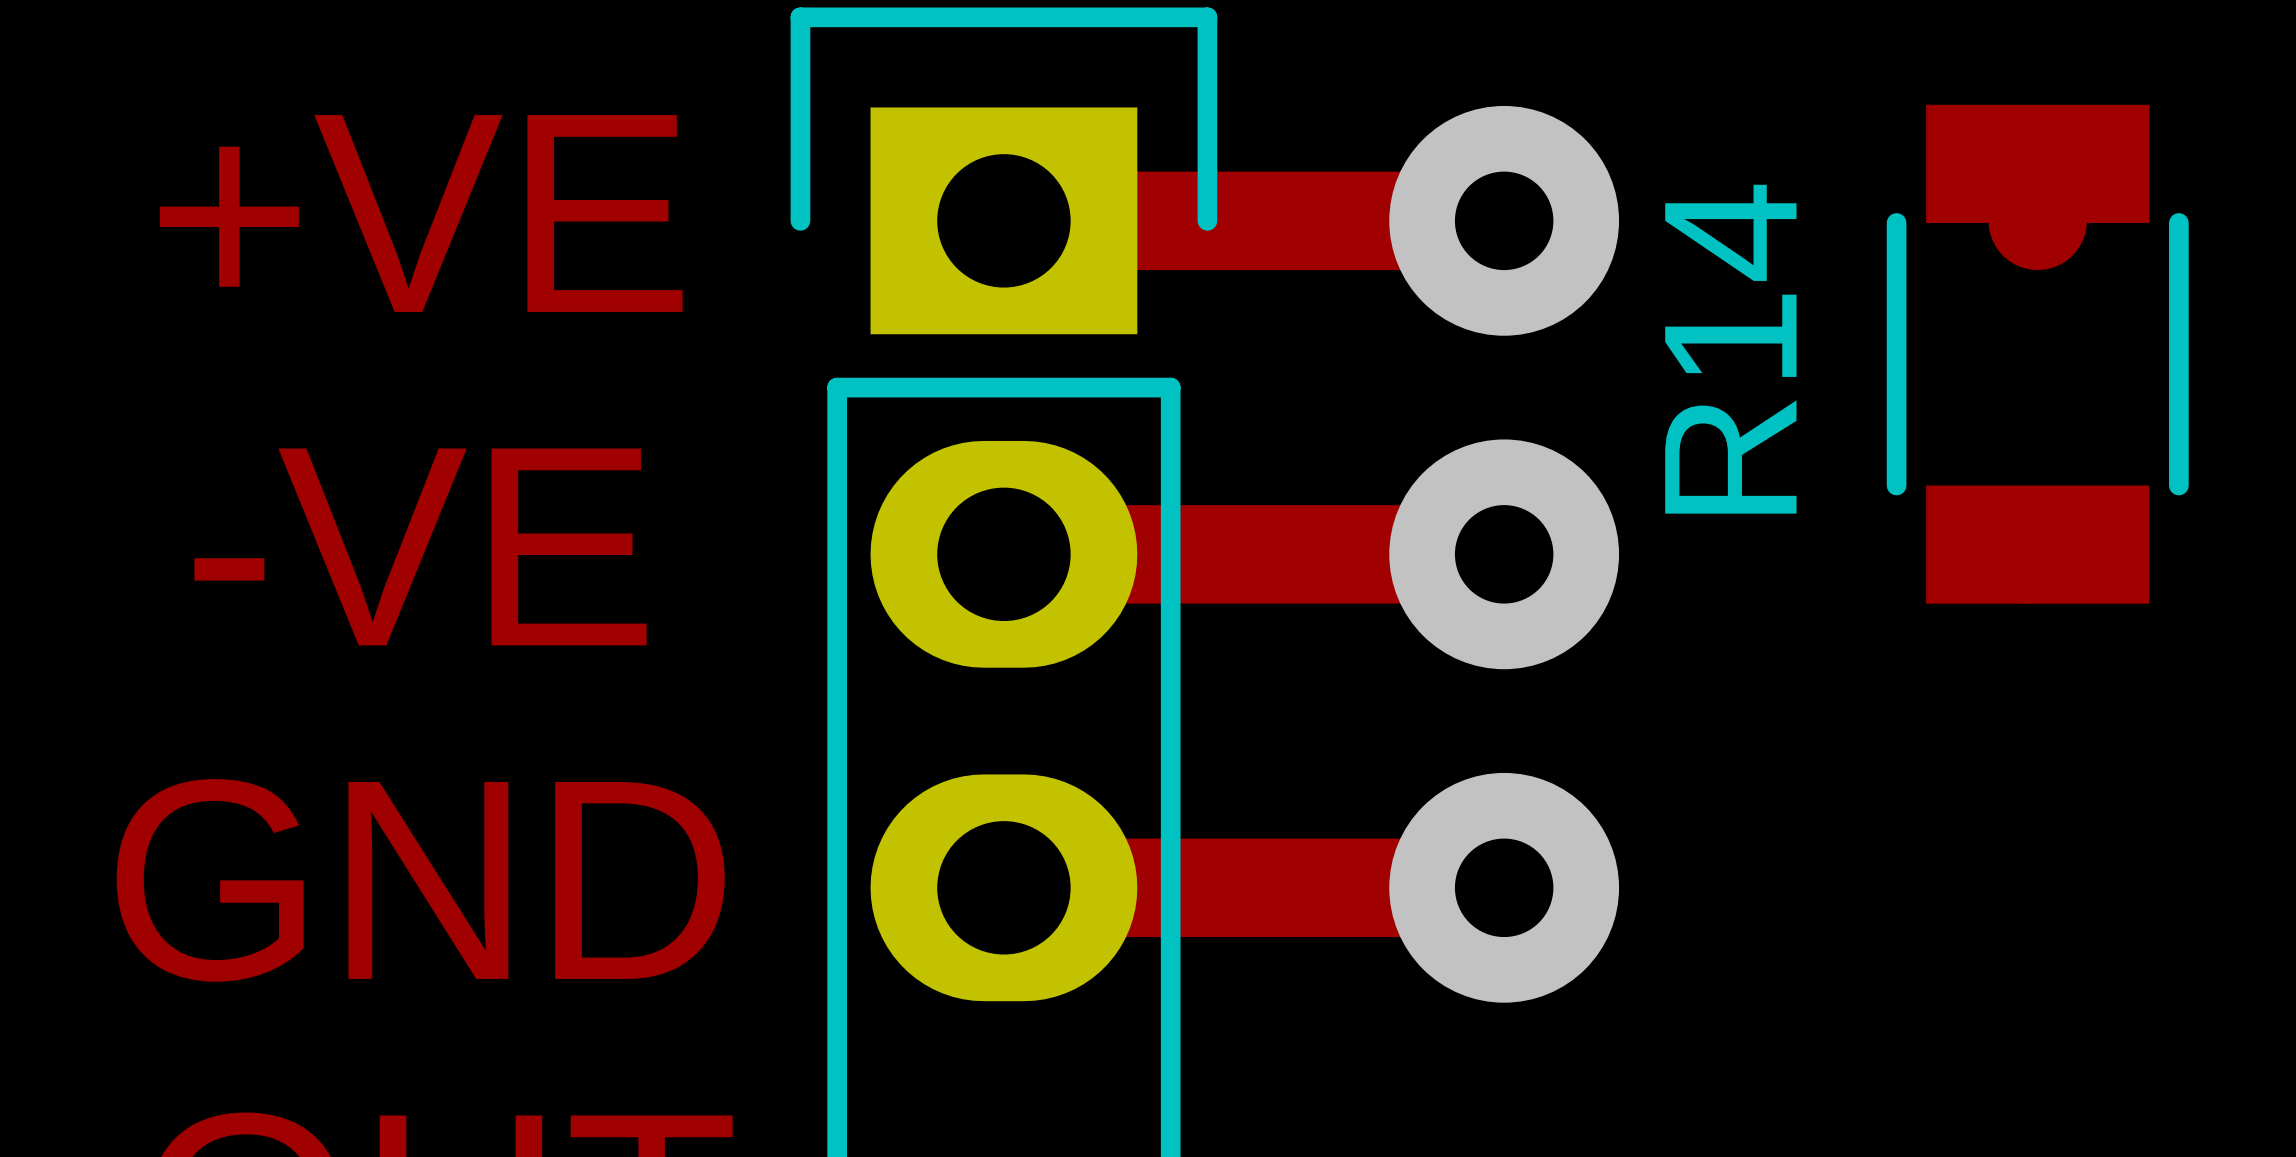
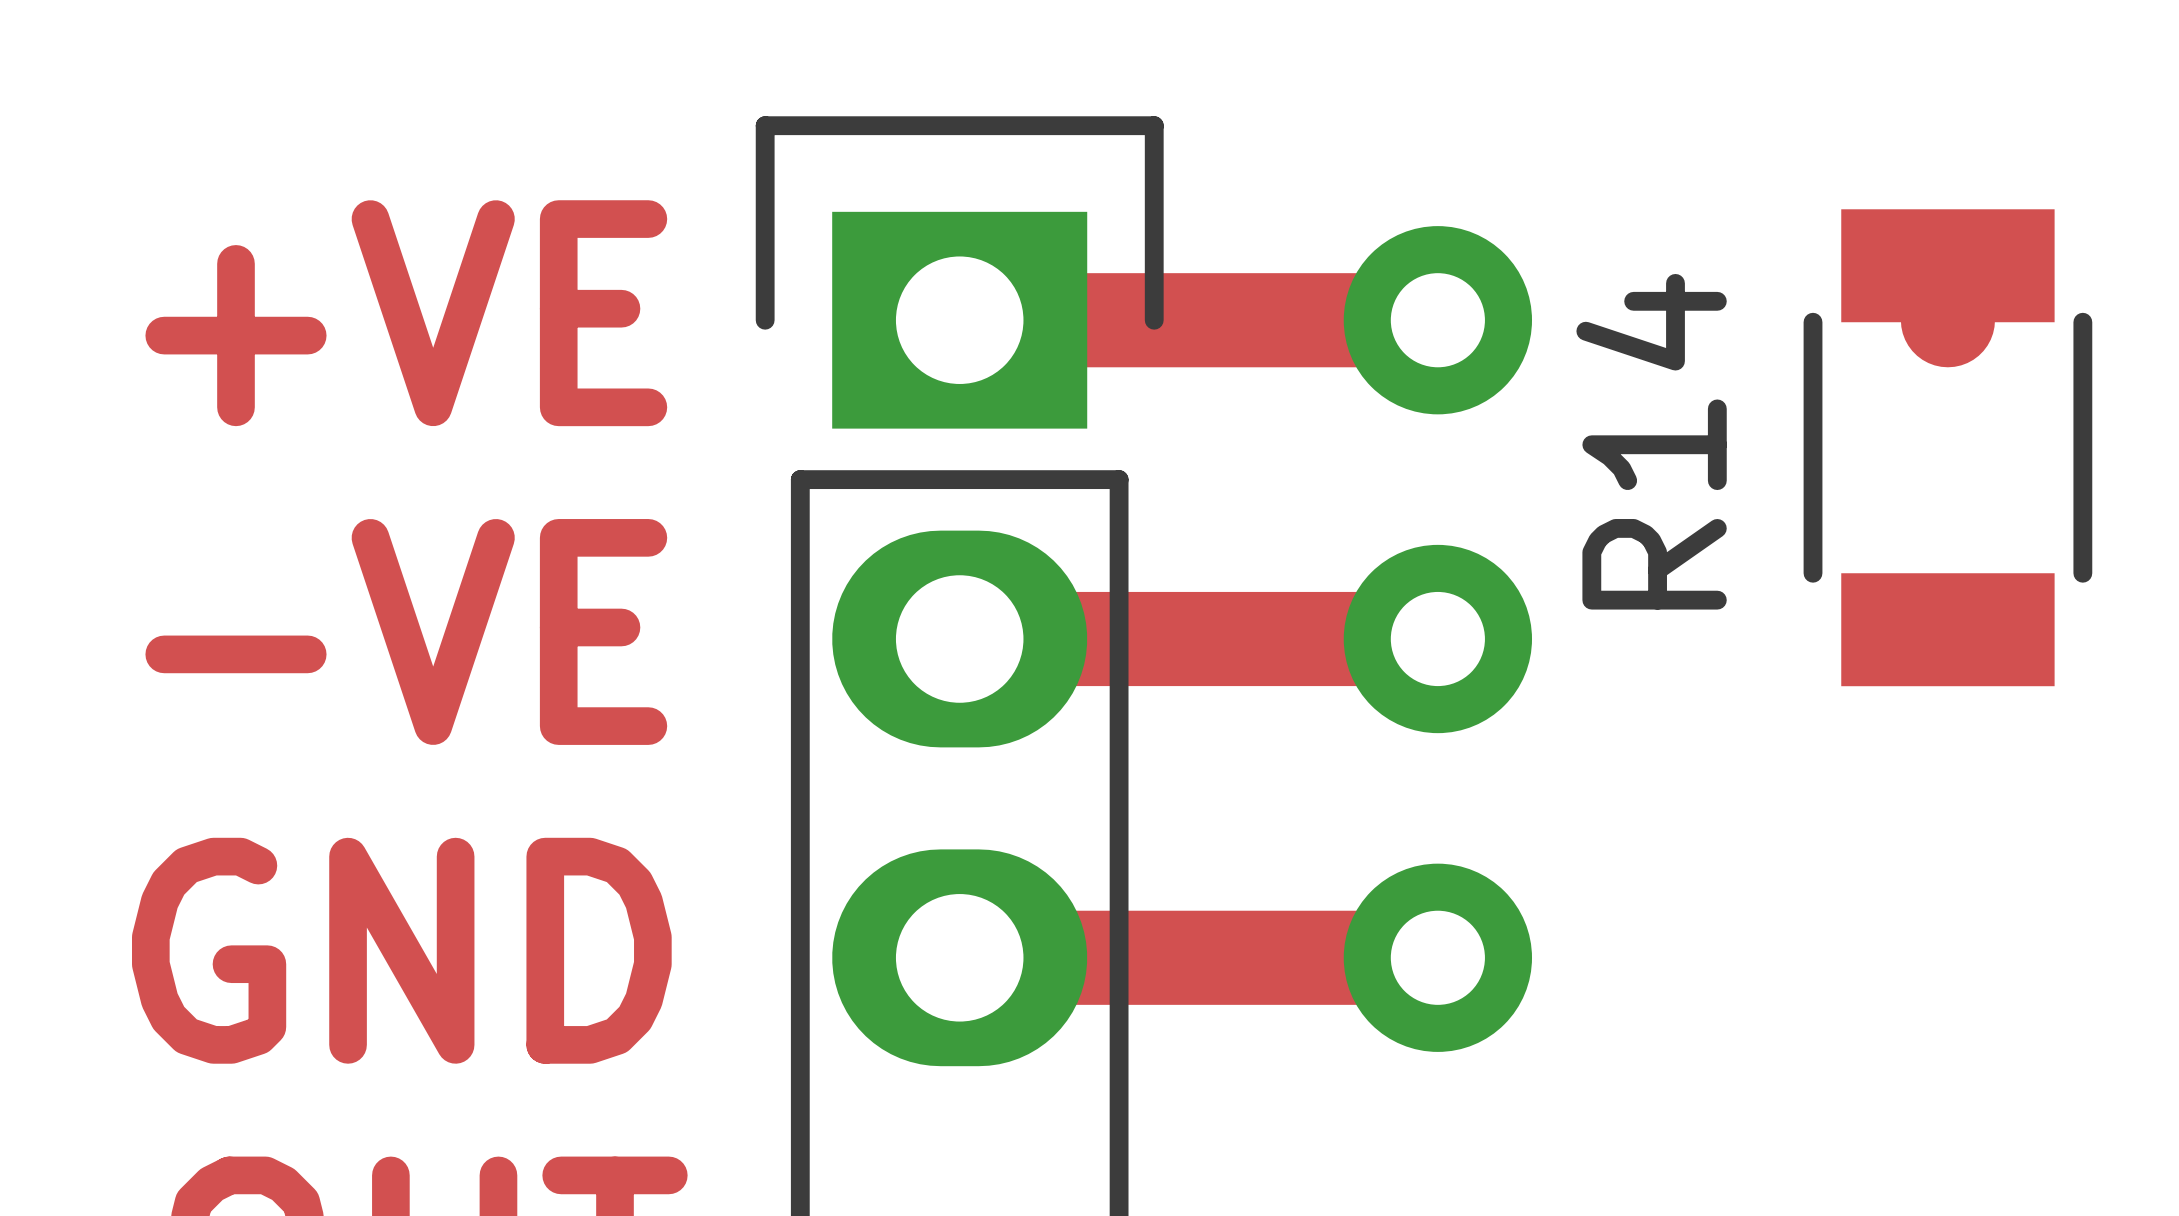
via size: [1389, 105, 1620, 336] -> [1343, 226, 1533, 415]
via size: [1389, 439, 1620, 670] -> [1343, 544, 1533, 734]
via size: [1389, 772, 1620, 1003] -> [1343, 863, 1533, 1052]

